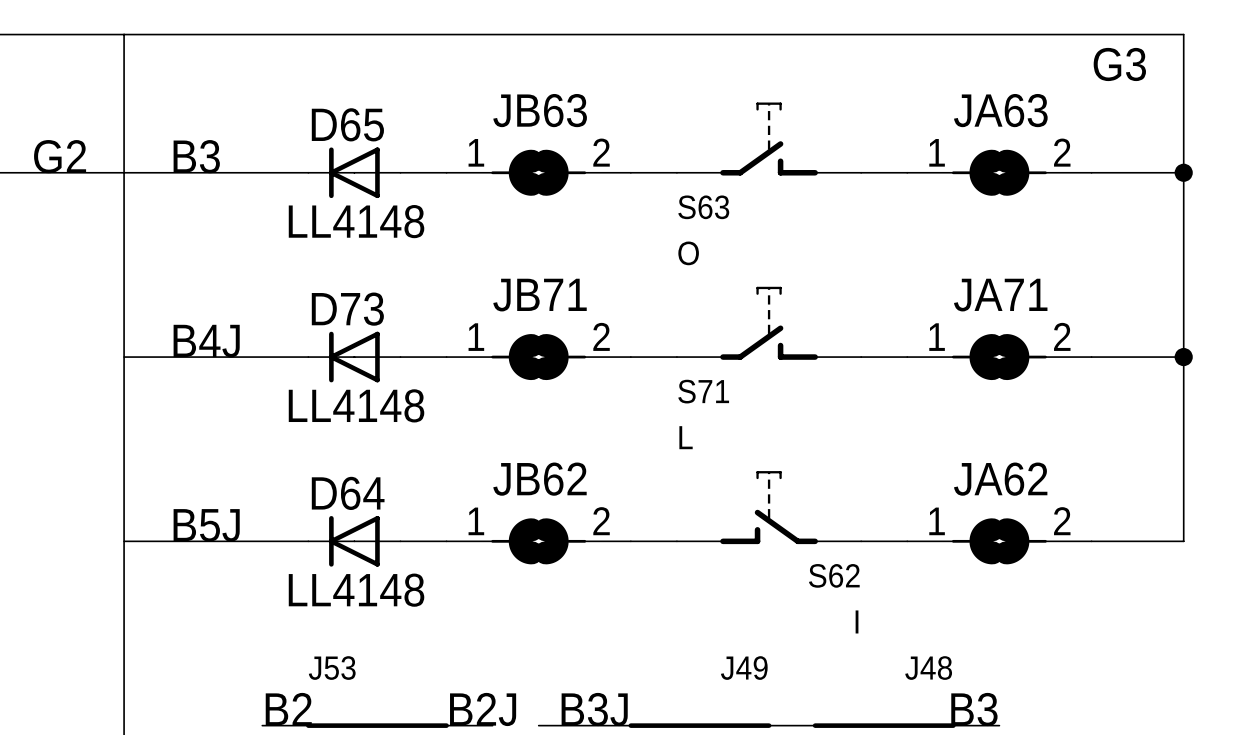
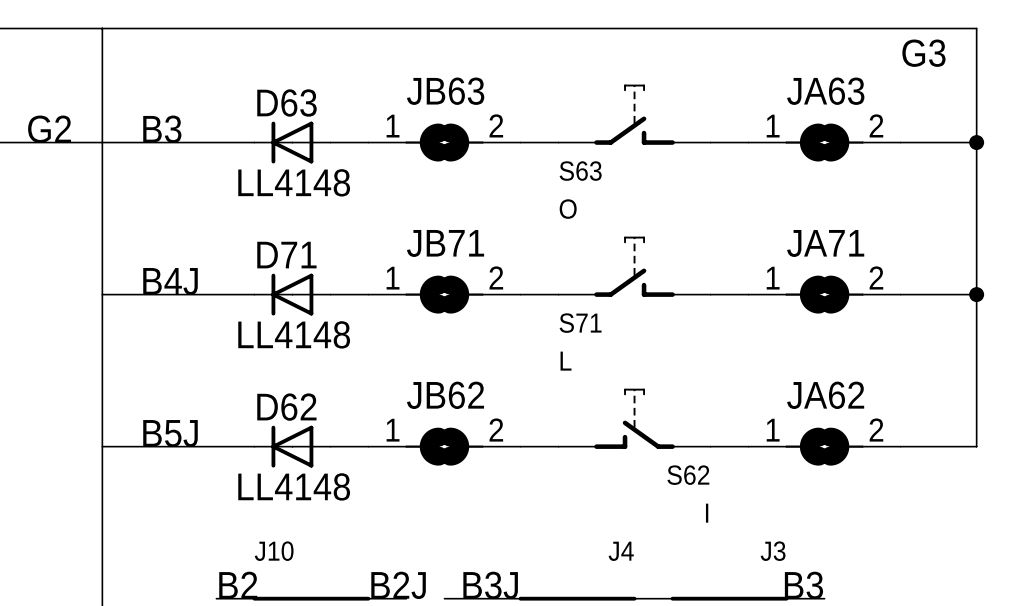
D65 name: D65 (347, 124) -> D63 (287, 103)
D73 name: D73 (347, 309) -> D71 (286, 255)
D64 name: D64 (348, 493) -> D62 (286, 407)
J53 name: J53 (332, 668) -> J10 (274, 551)
J49 name: J49 (744, 668) -> J4 (621, 551)
J48 name: J48 (928, 668) -> J3 (773, 551)

